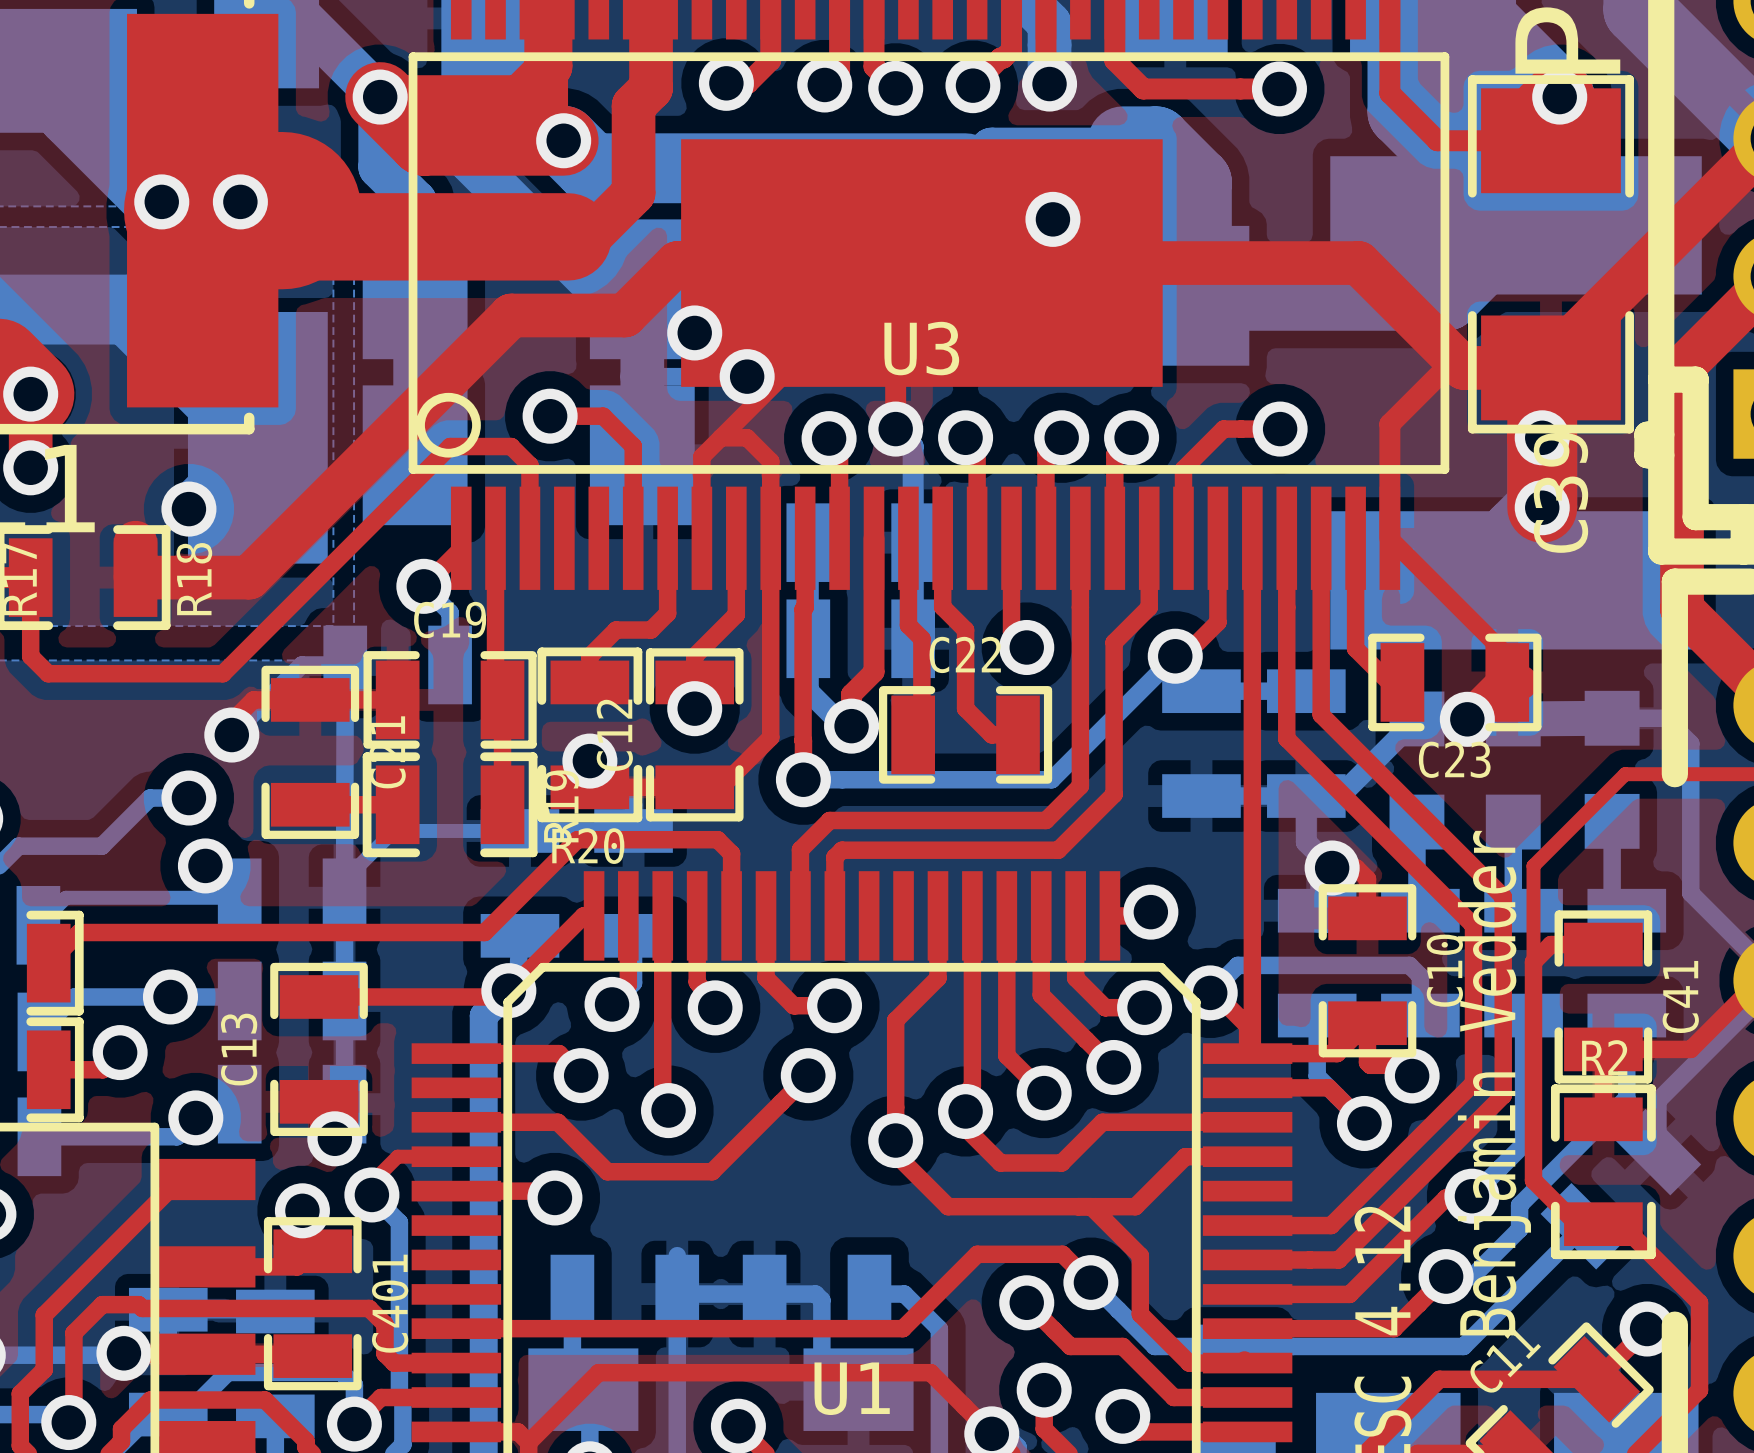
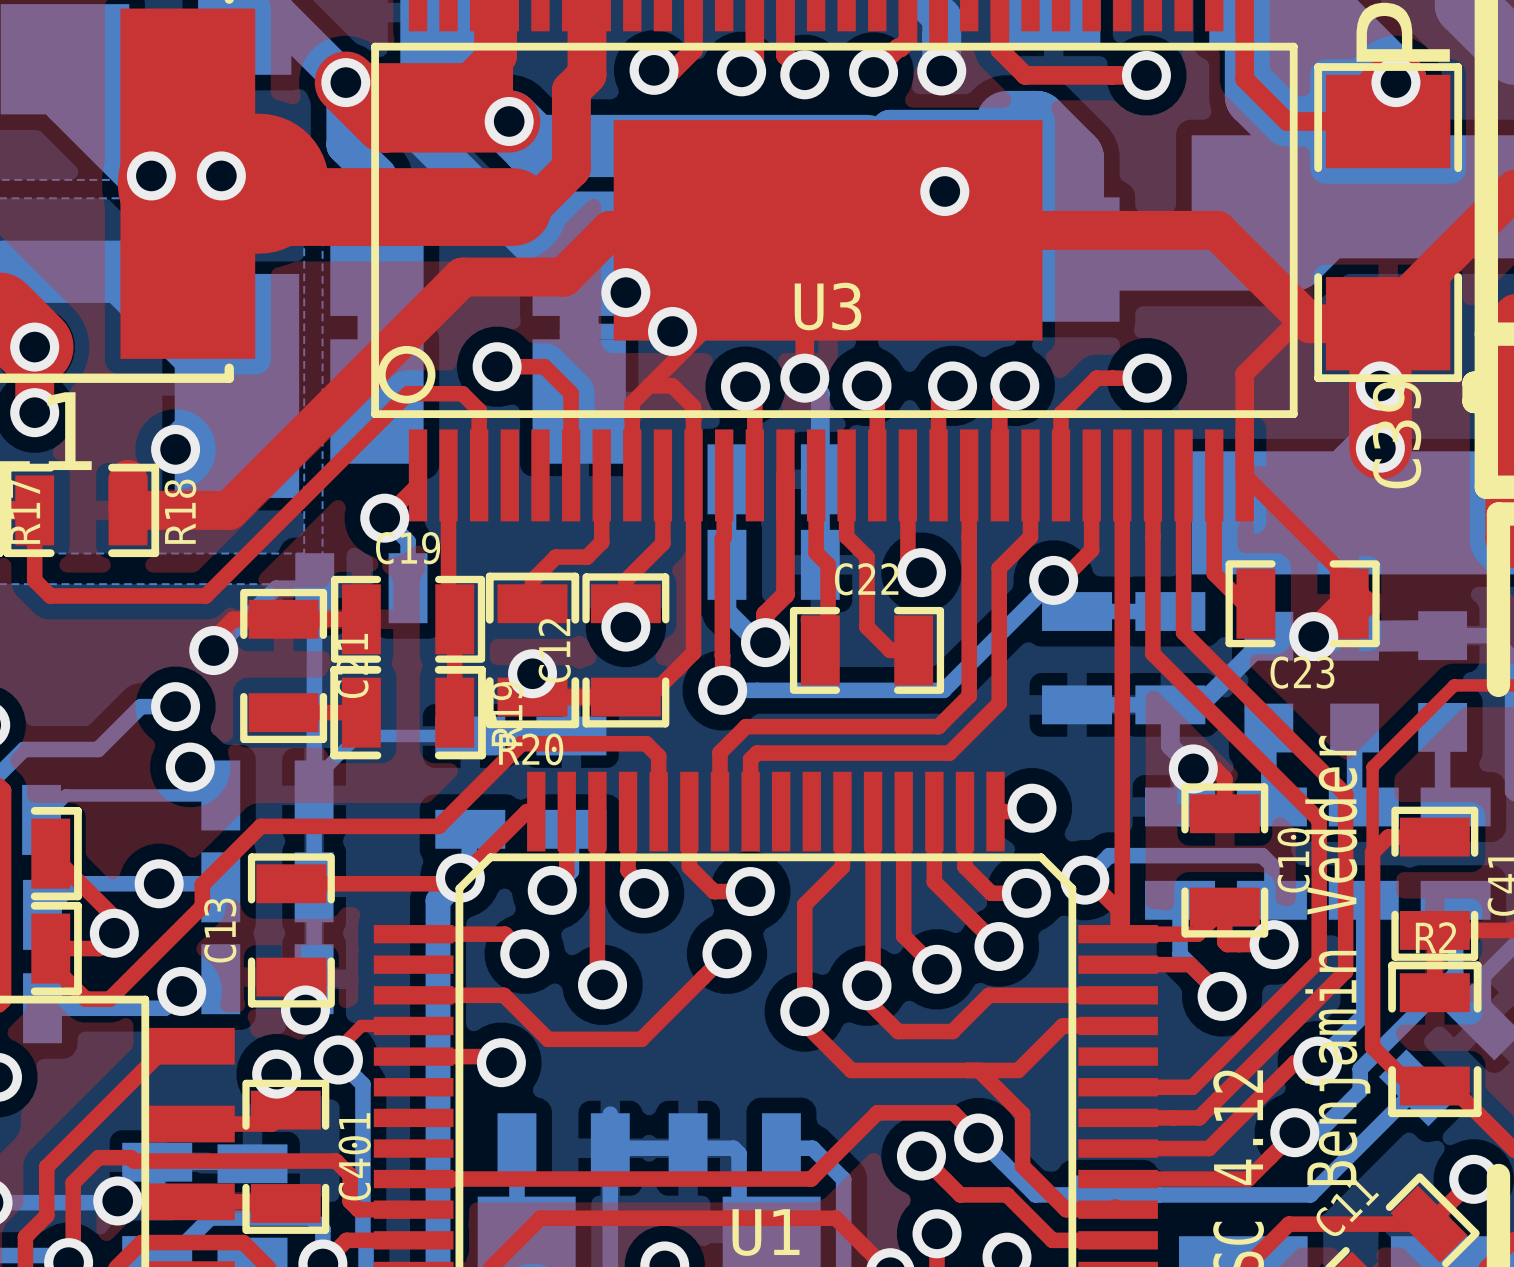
top track: (284, 932) (79, 932) (48, 963) -> (260, 826) (202, 884) (202, 906) (109, 999) (85, 999) (50, 964)
top track: none -> (50, 853) (114, 917)
via position: (1412, 1076) -> (1274, 944)

